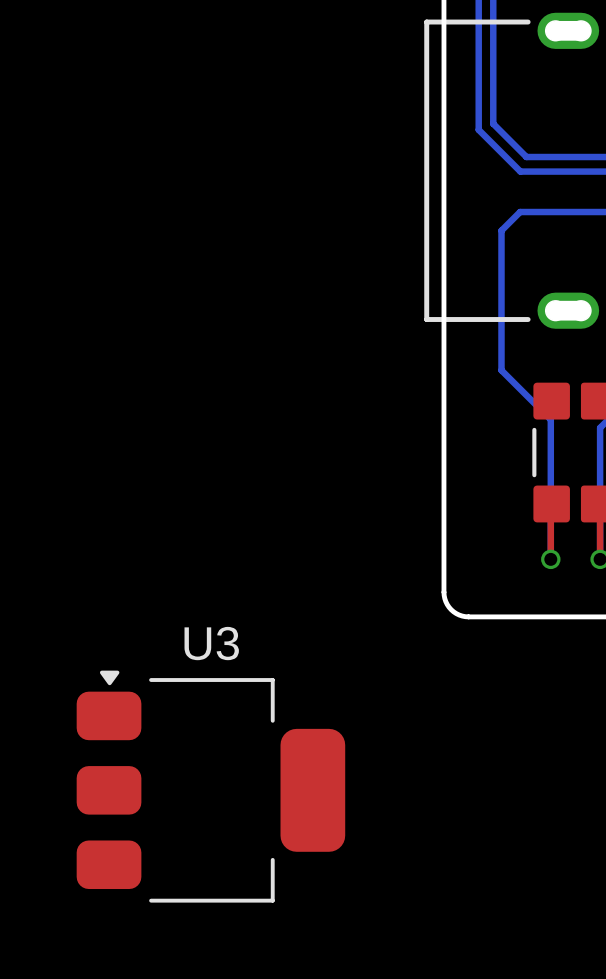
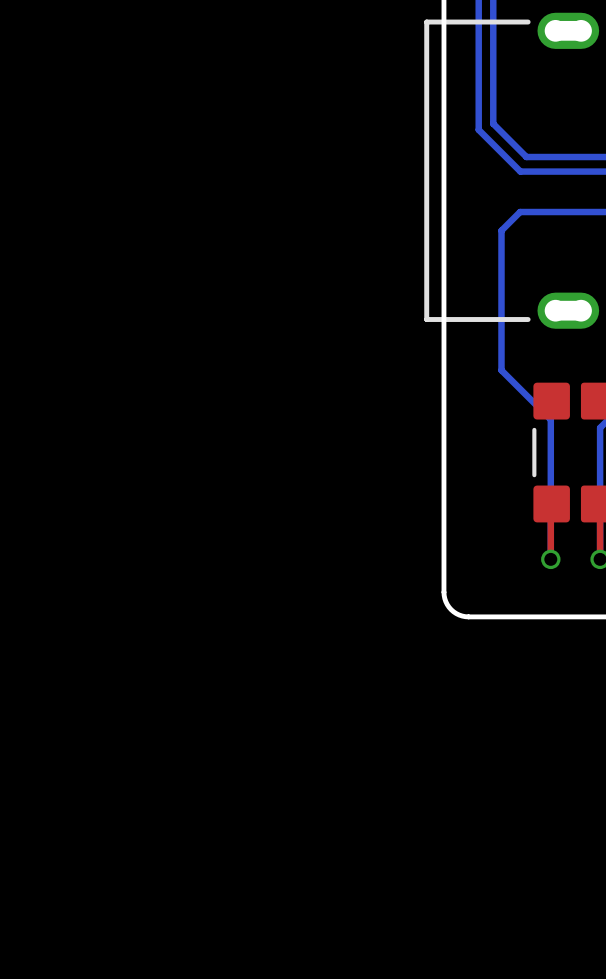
U3: (210, 786) -> none

